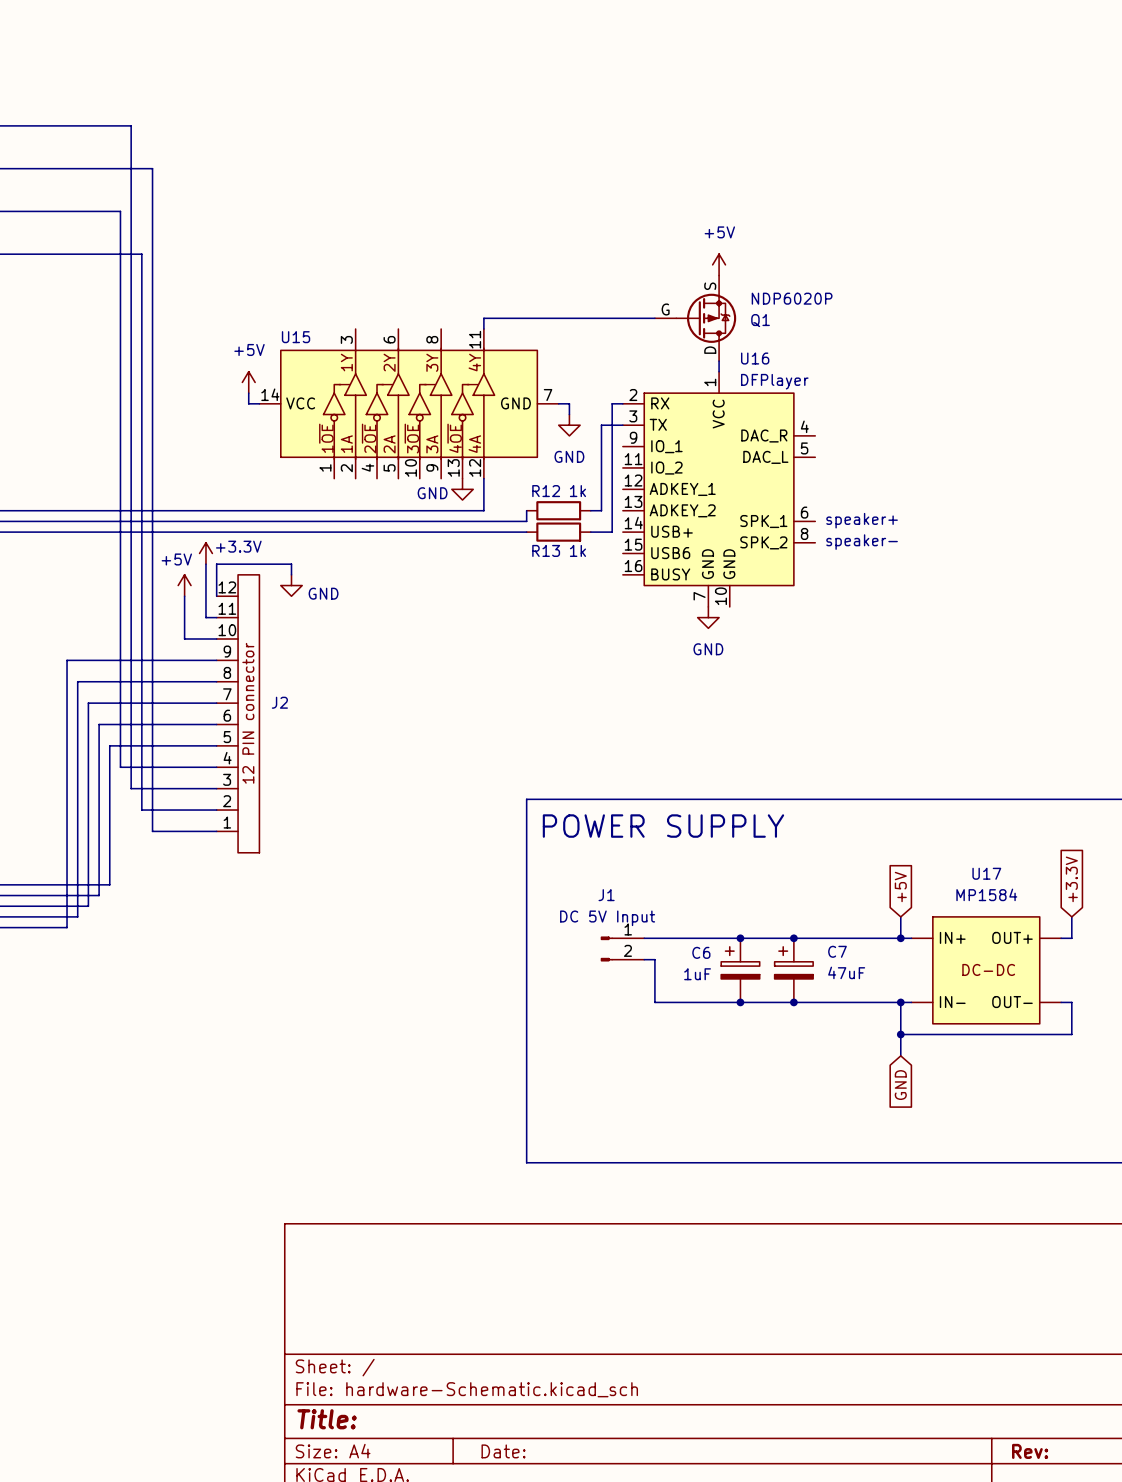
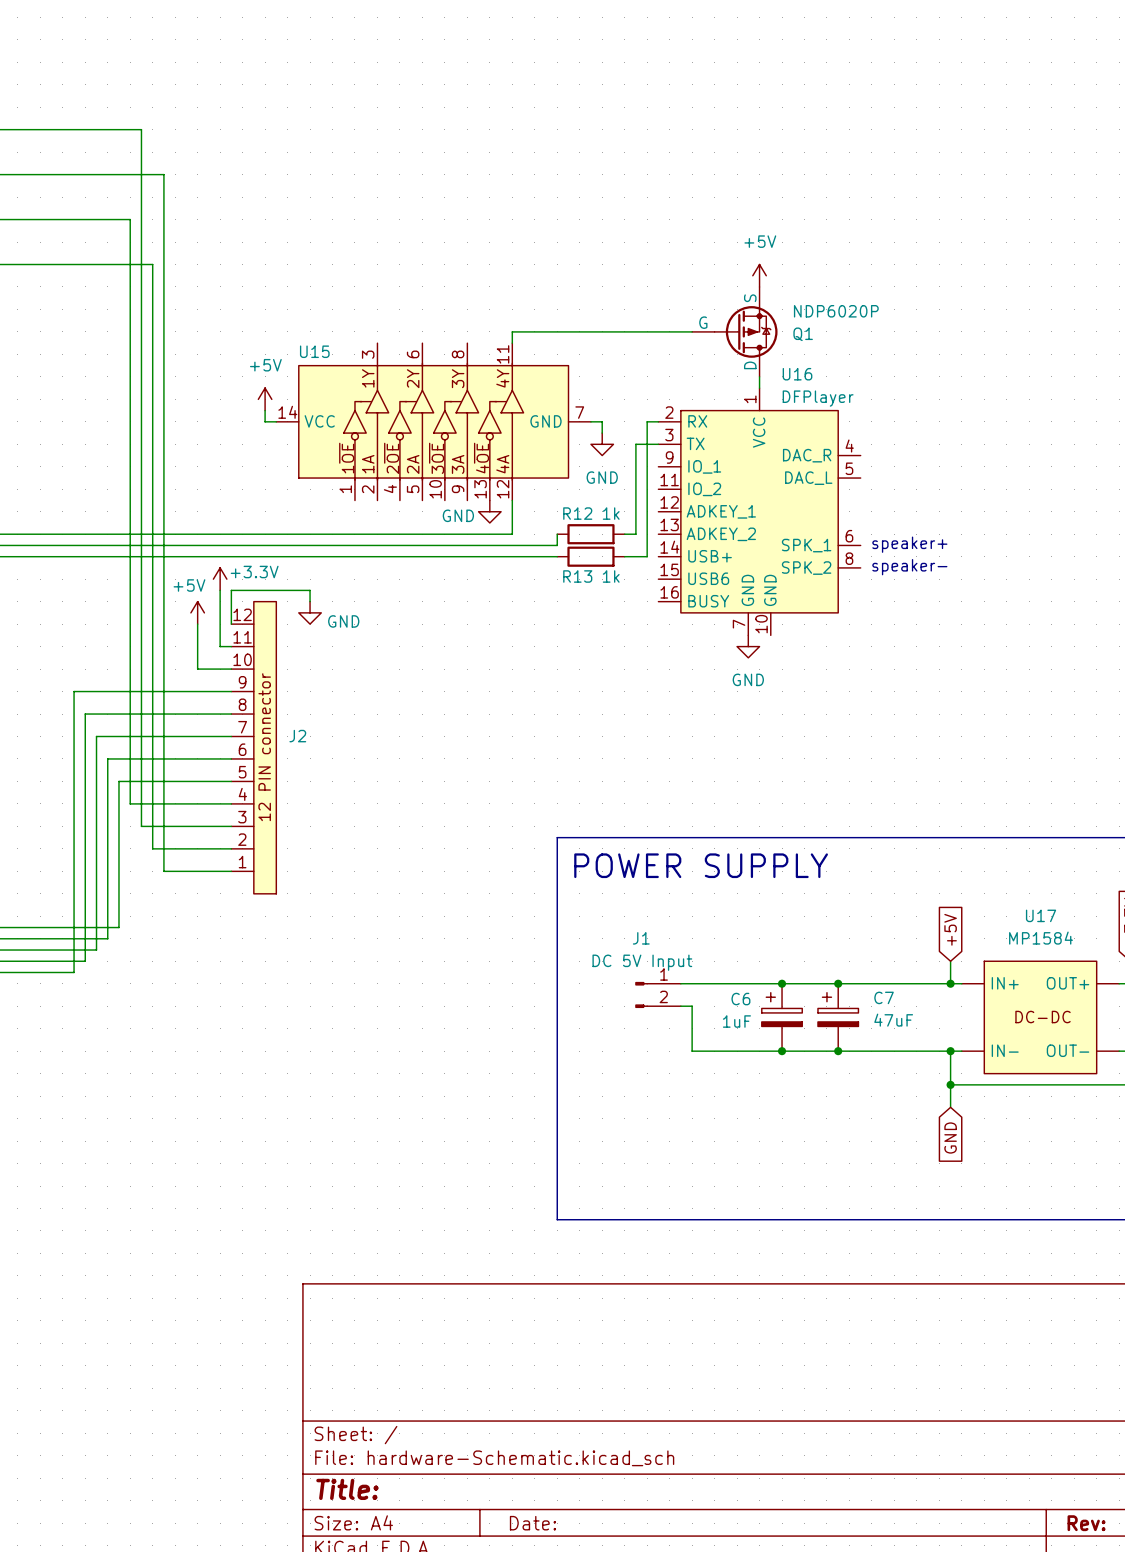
J2 symbol: [216, 574, 260, 853] -> [231, 601, 277, 894]

